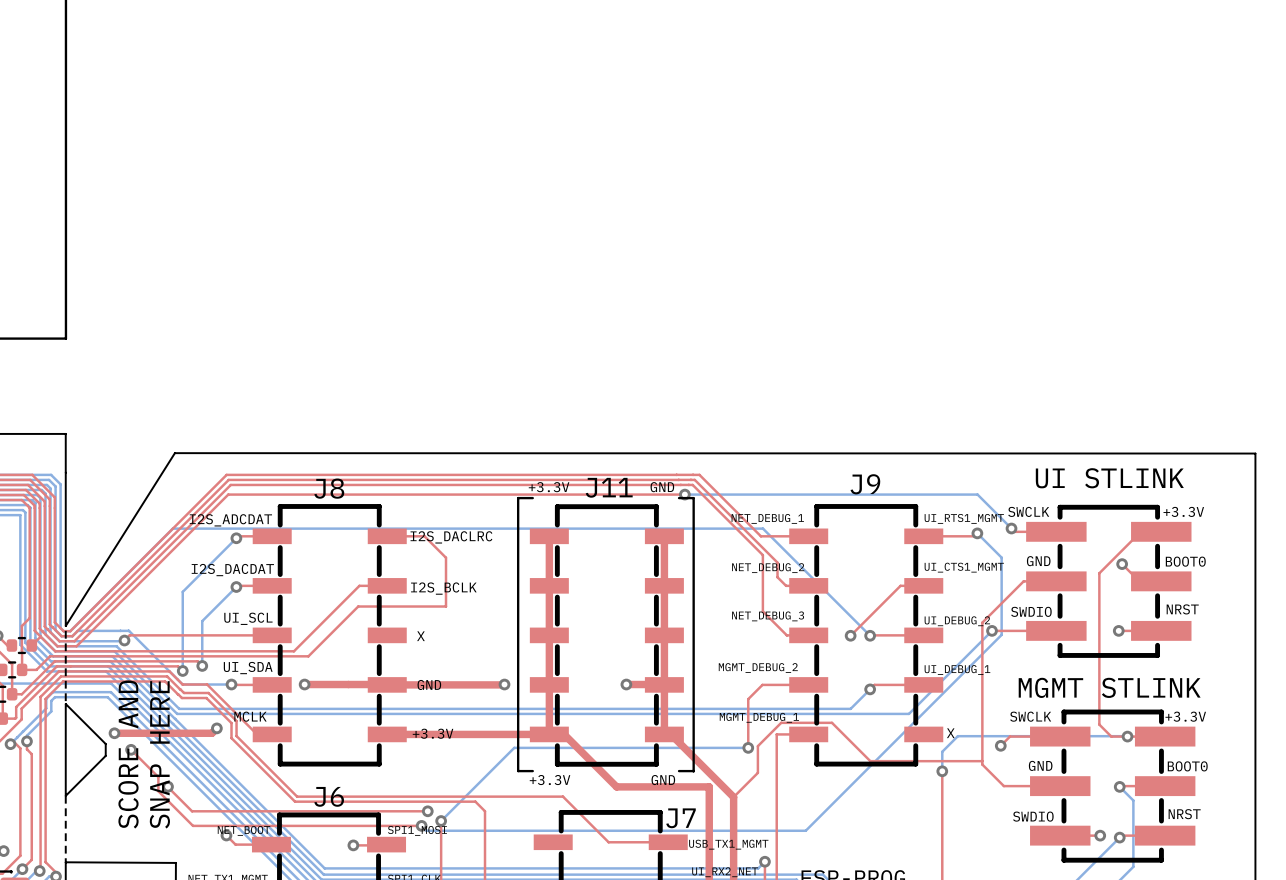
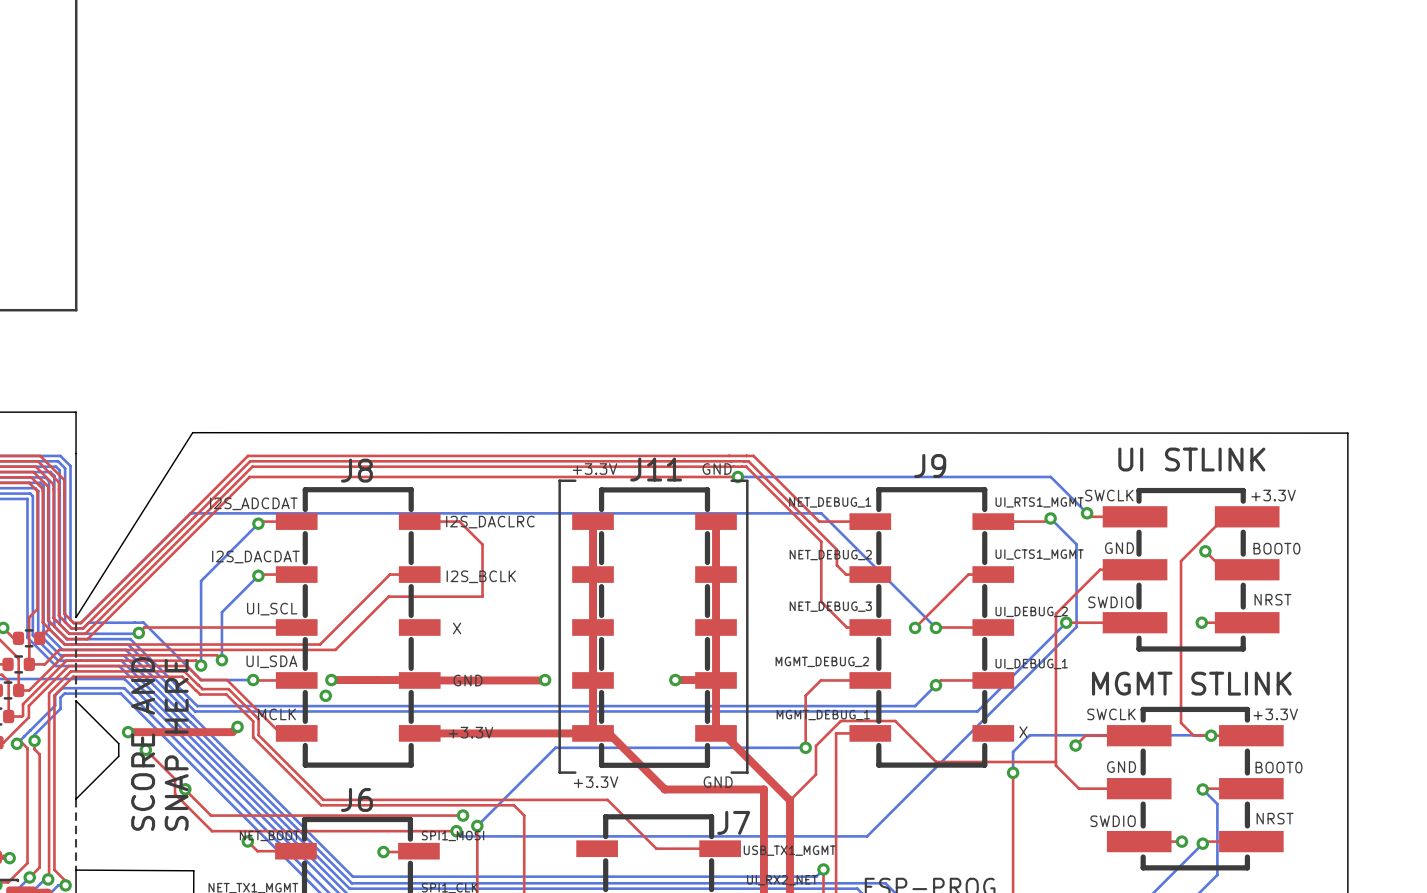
via: none -> (325, 695)

